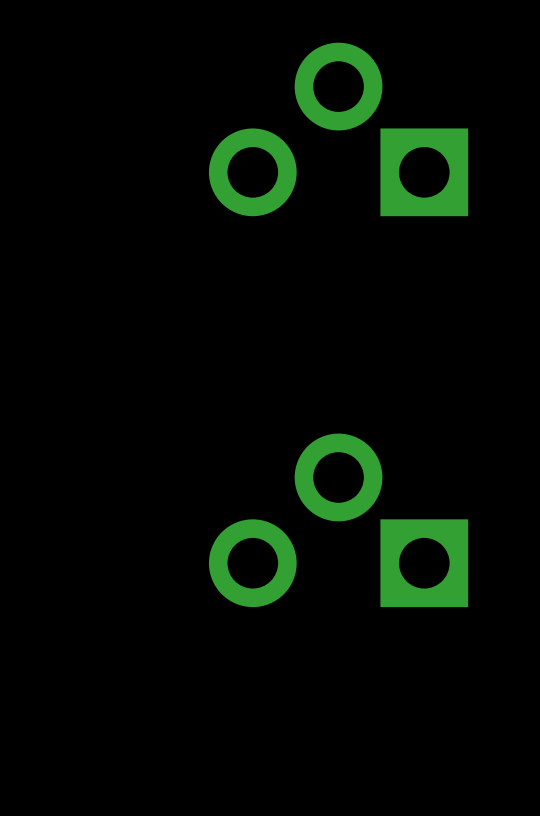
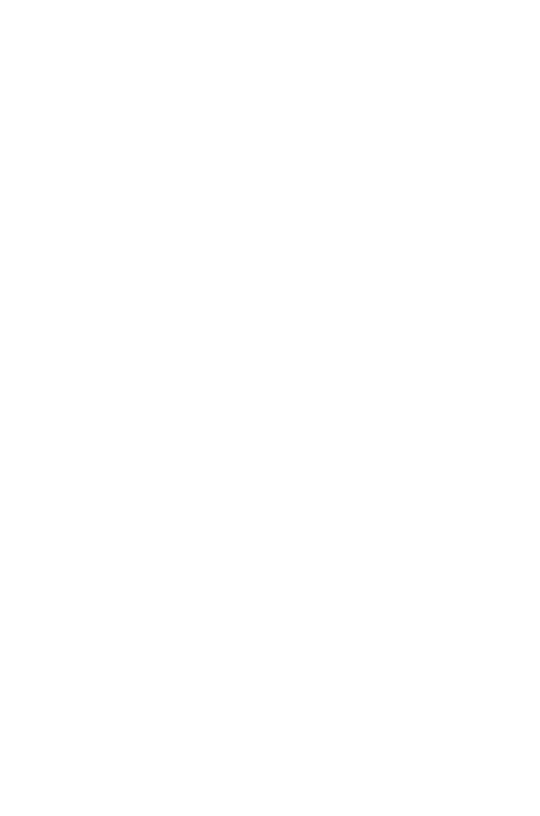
part: (338, 129) -> none
part: (338, 520) -> none

